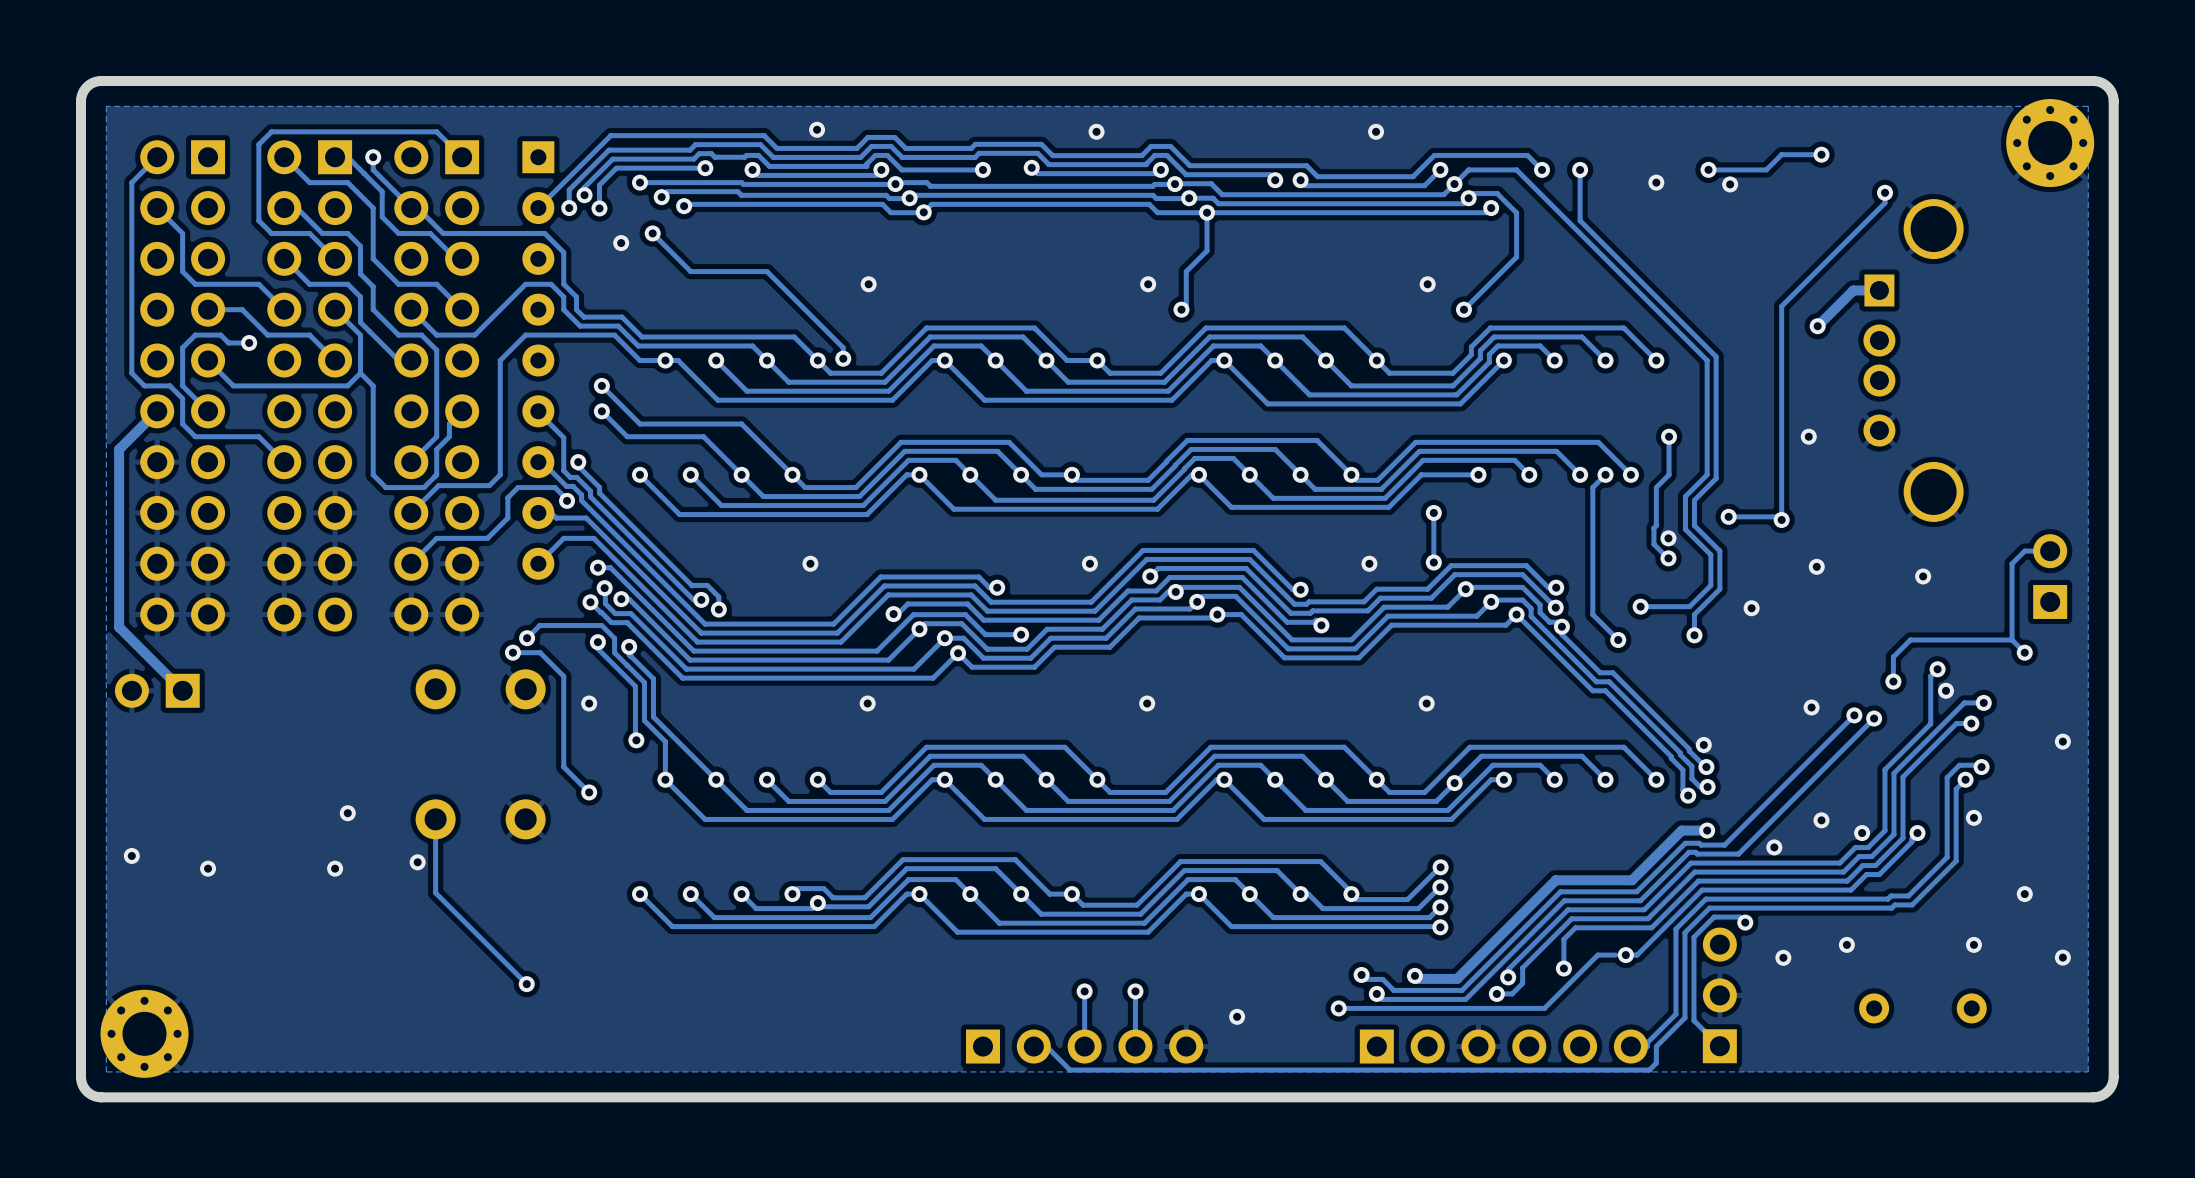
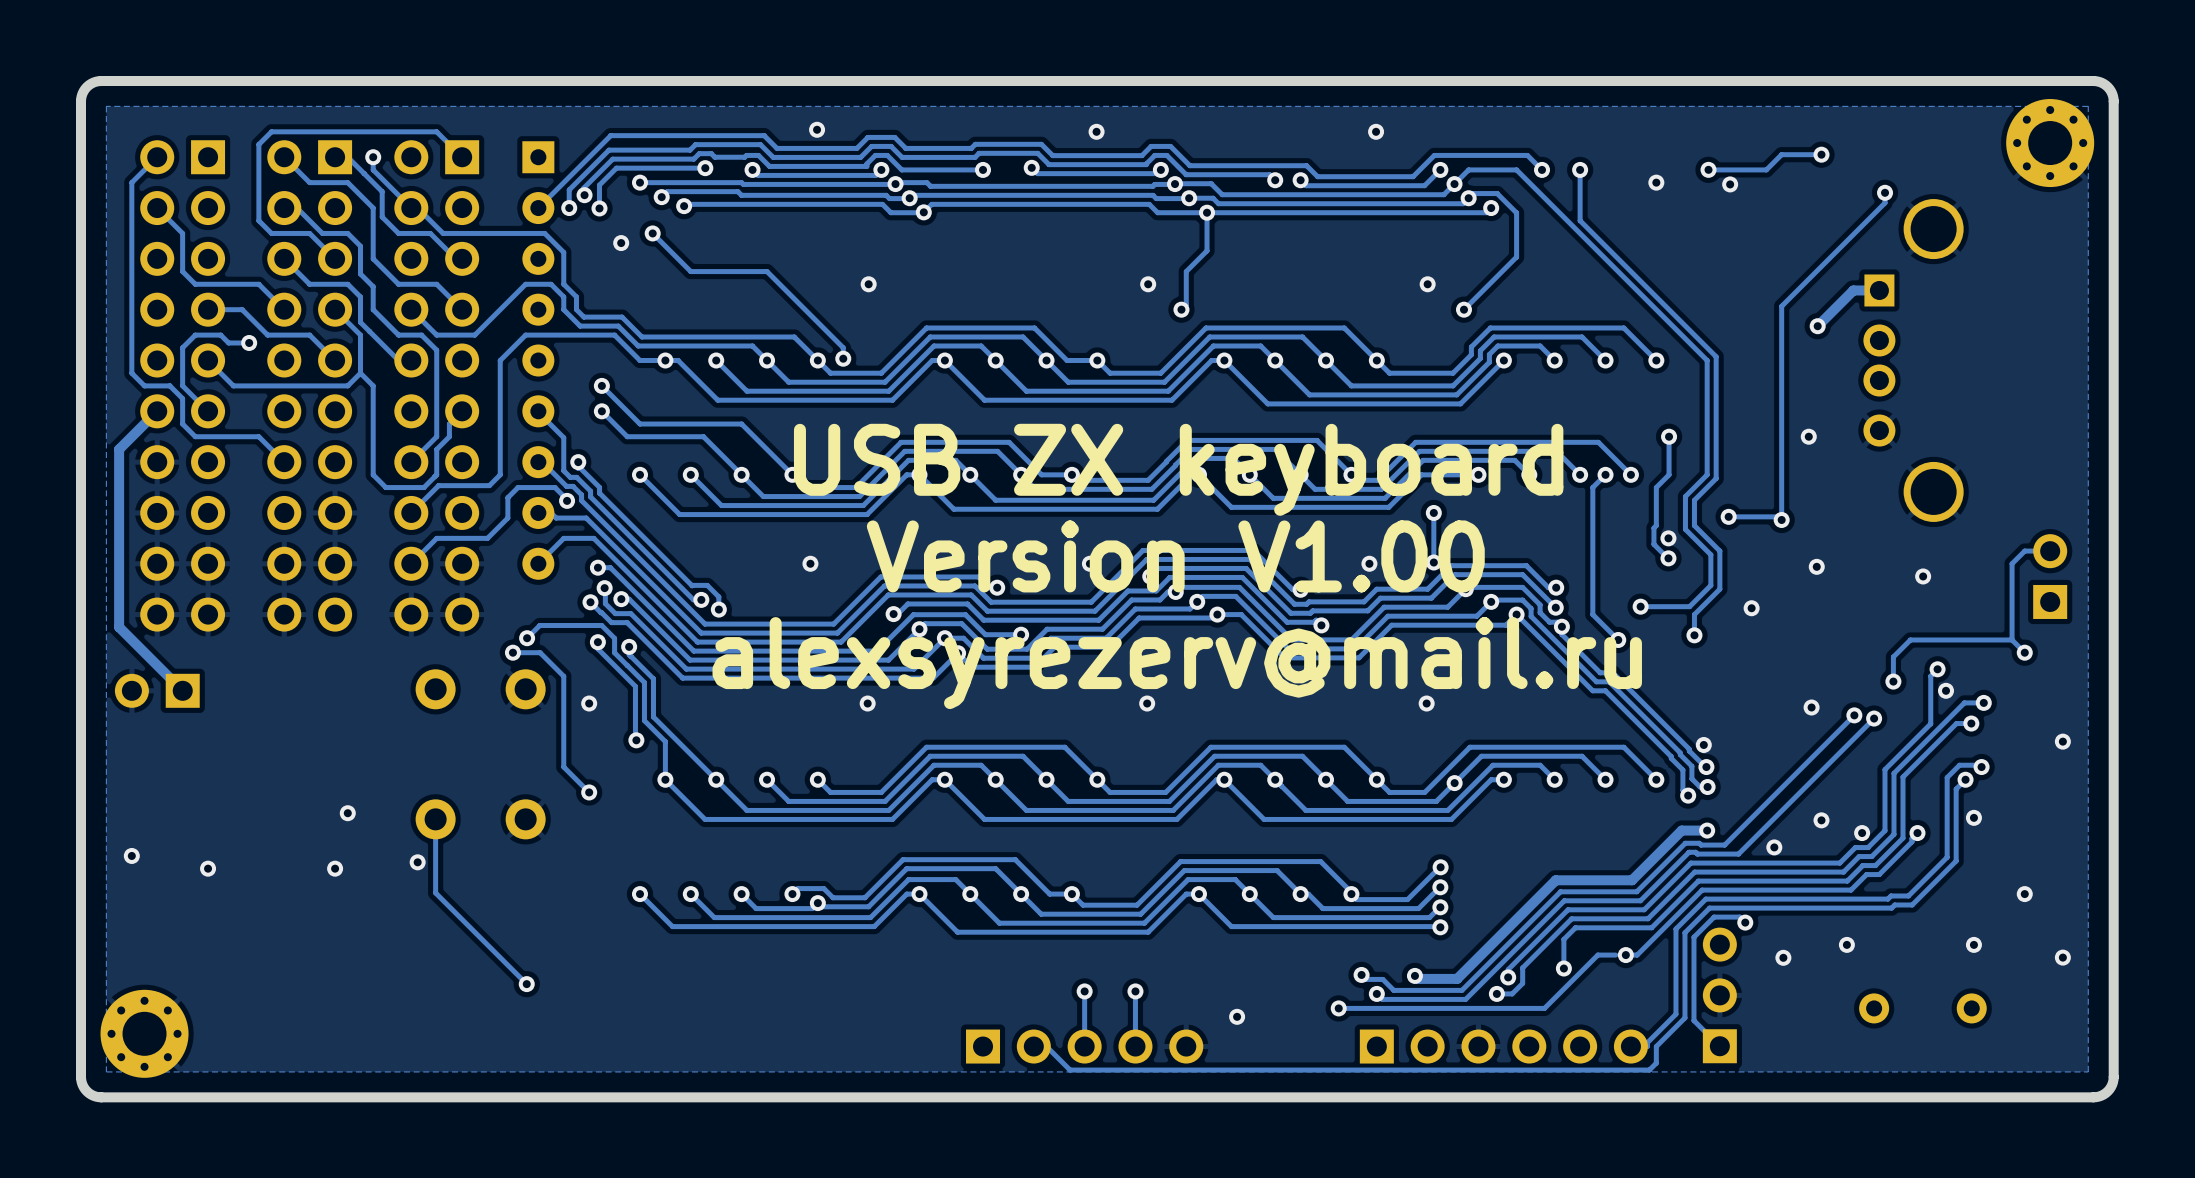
text: none -> USB ZX keyboard (1178, 469)
text: none -> Version V1.00 (1175, 556)
text: none -> alexsyrezerv@mail.ru (1177, 663)

